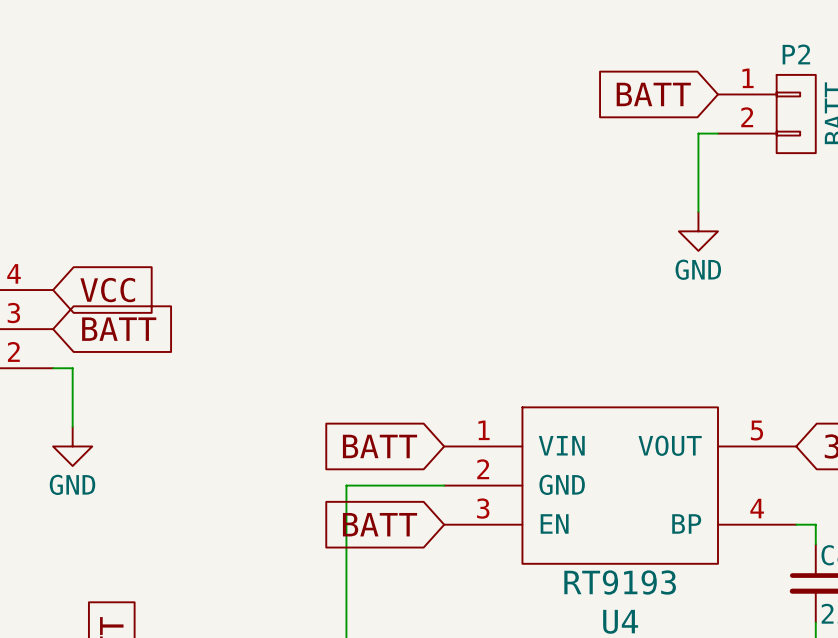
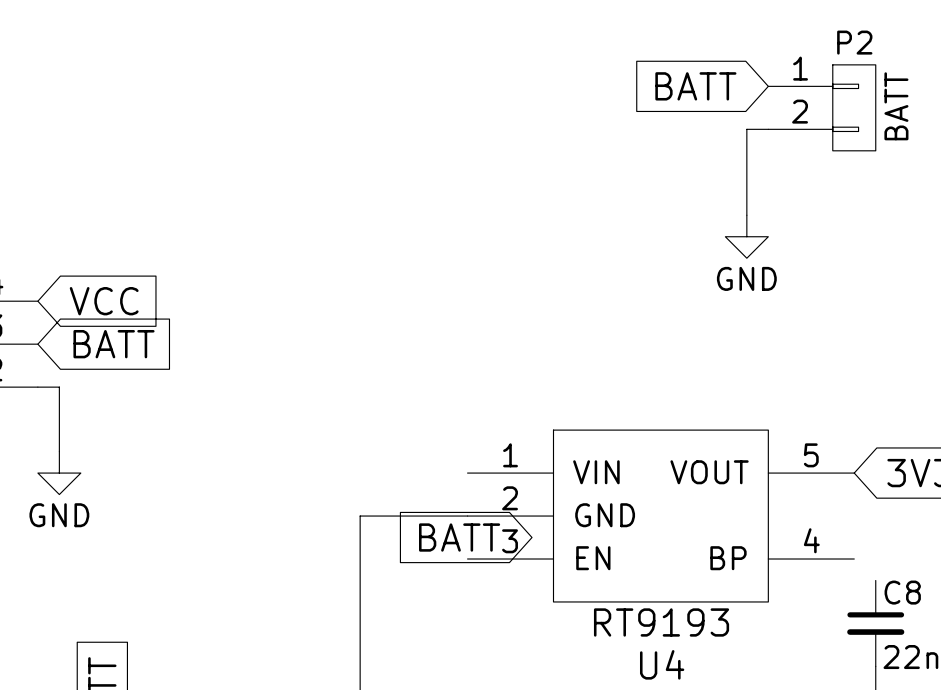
global label: BATT (380, 446) -> none
global label position: BATT (380, 524) -> BATT (459, 537)
wire: (796, 524) (815, 524) (815, 544) -> none

